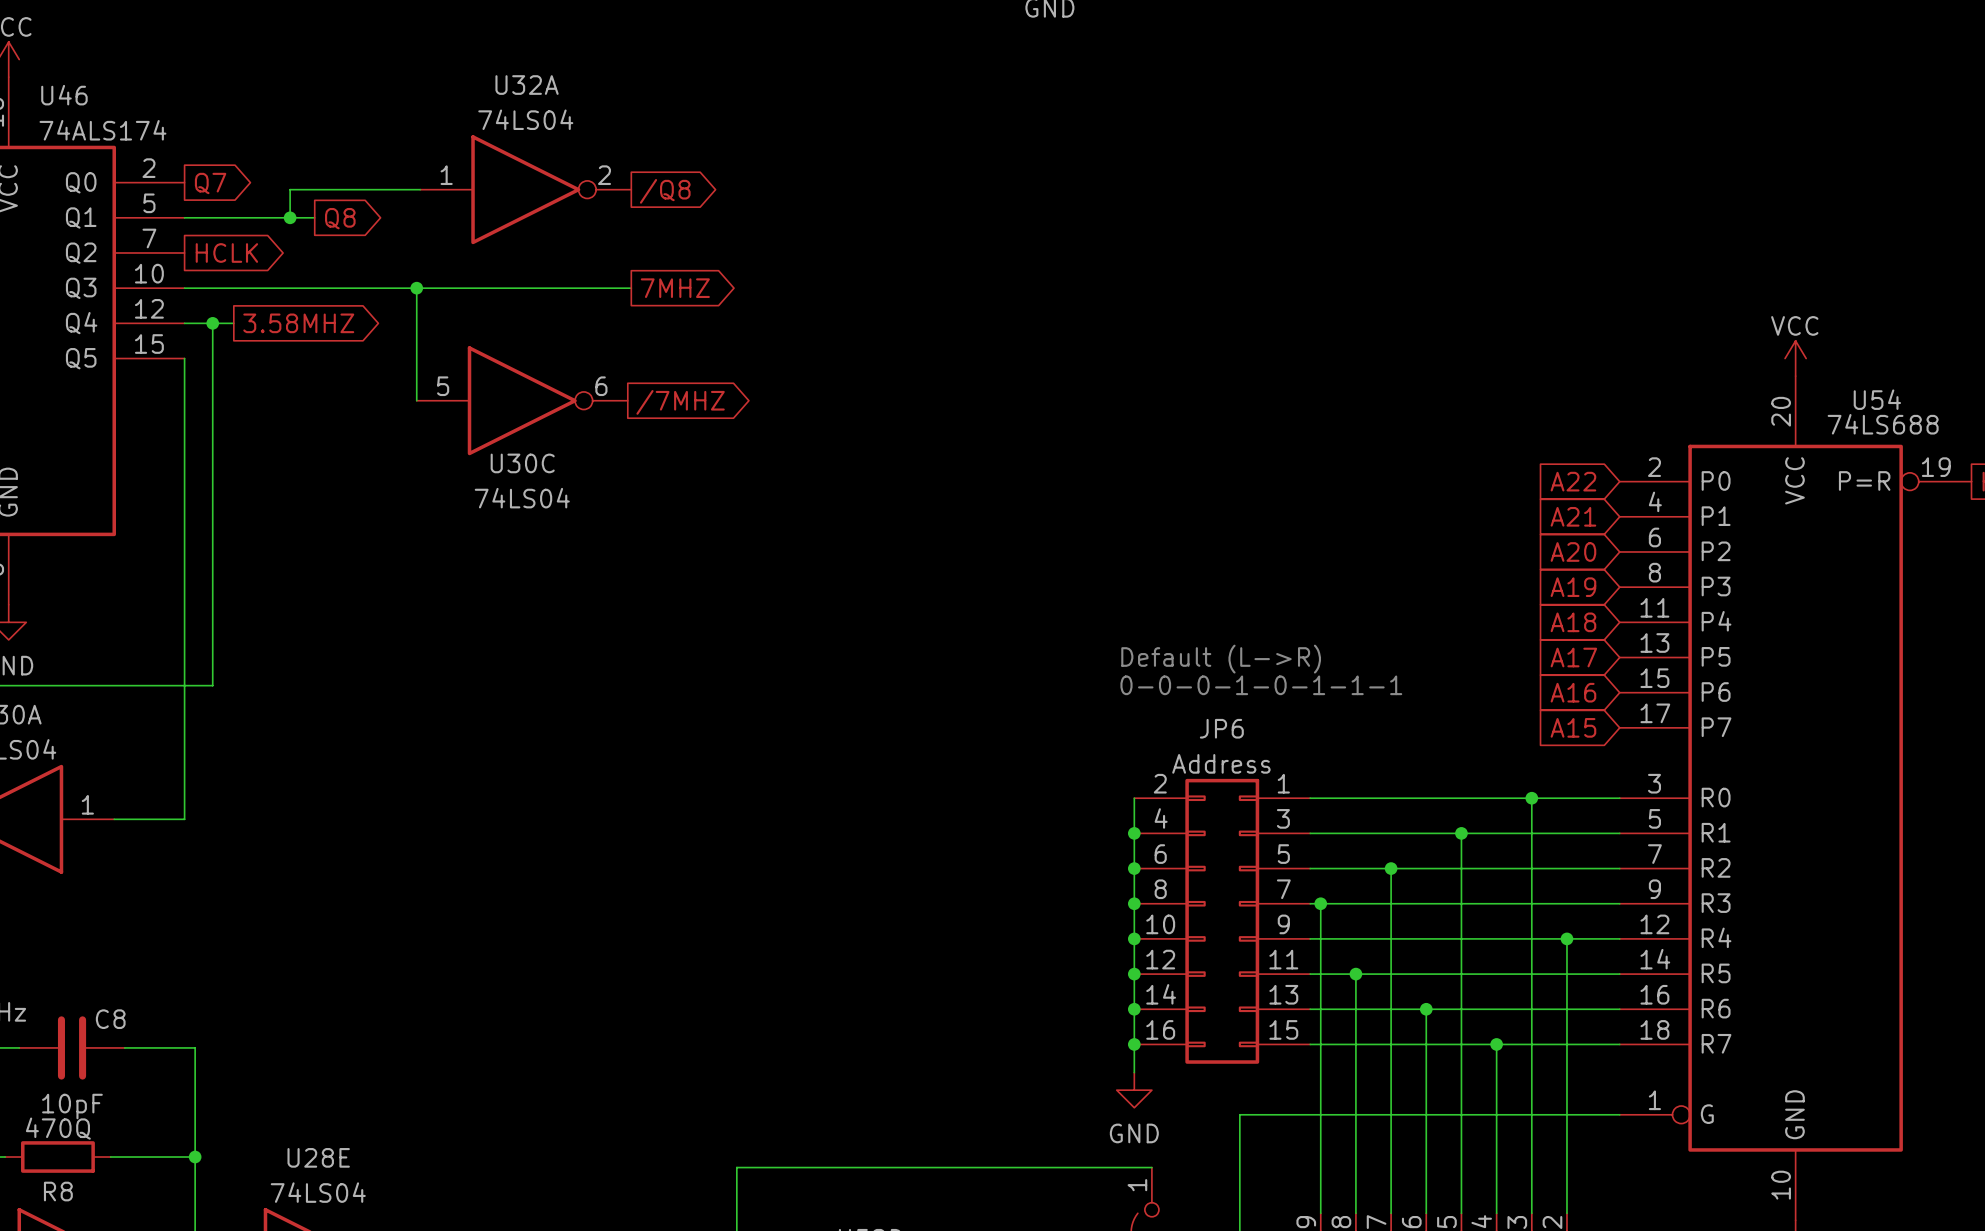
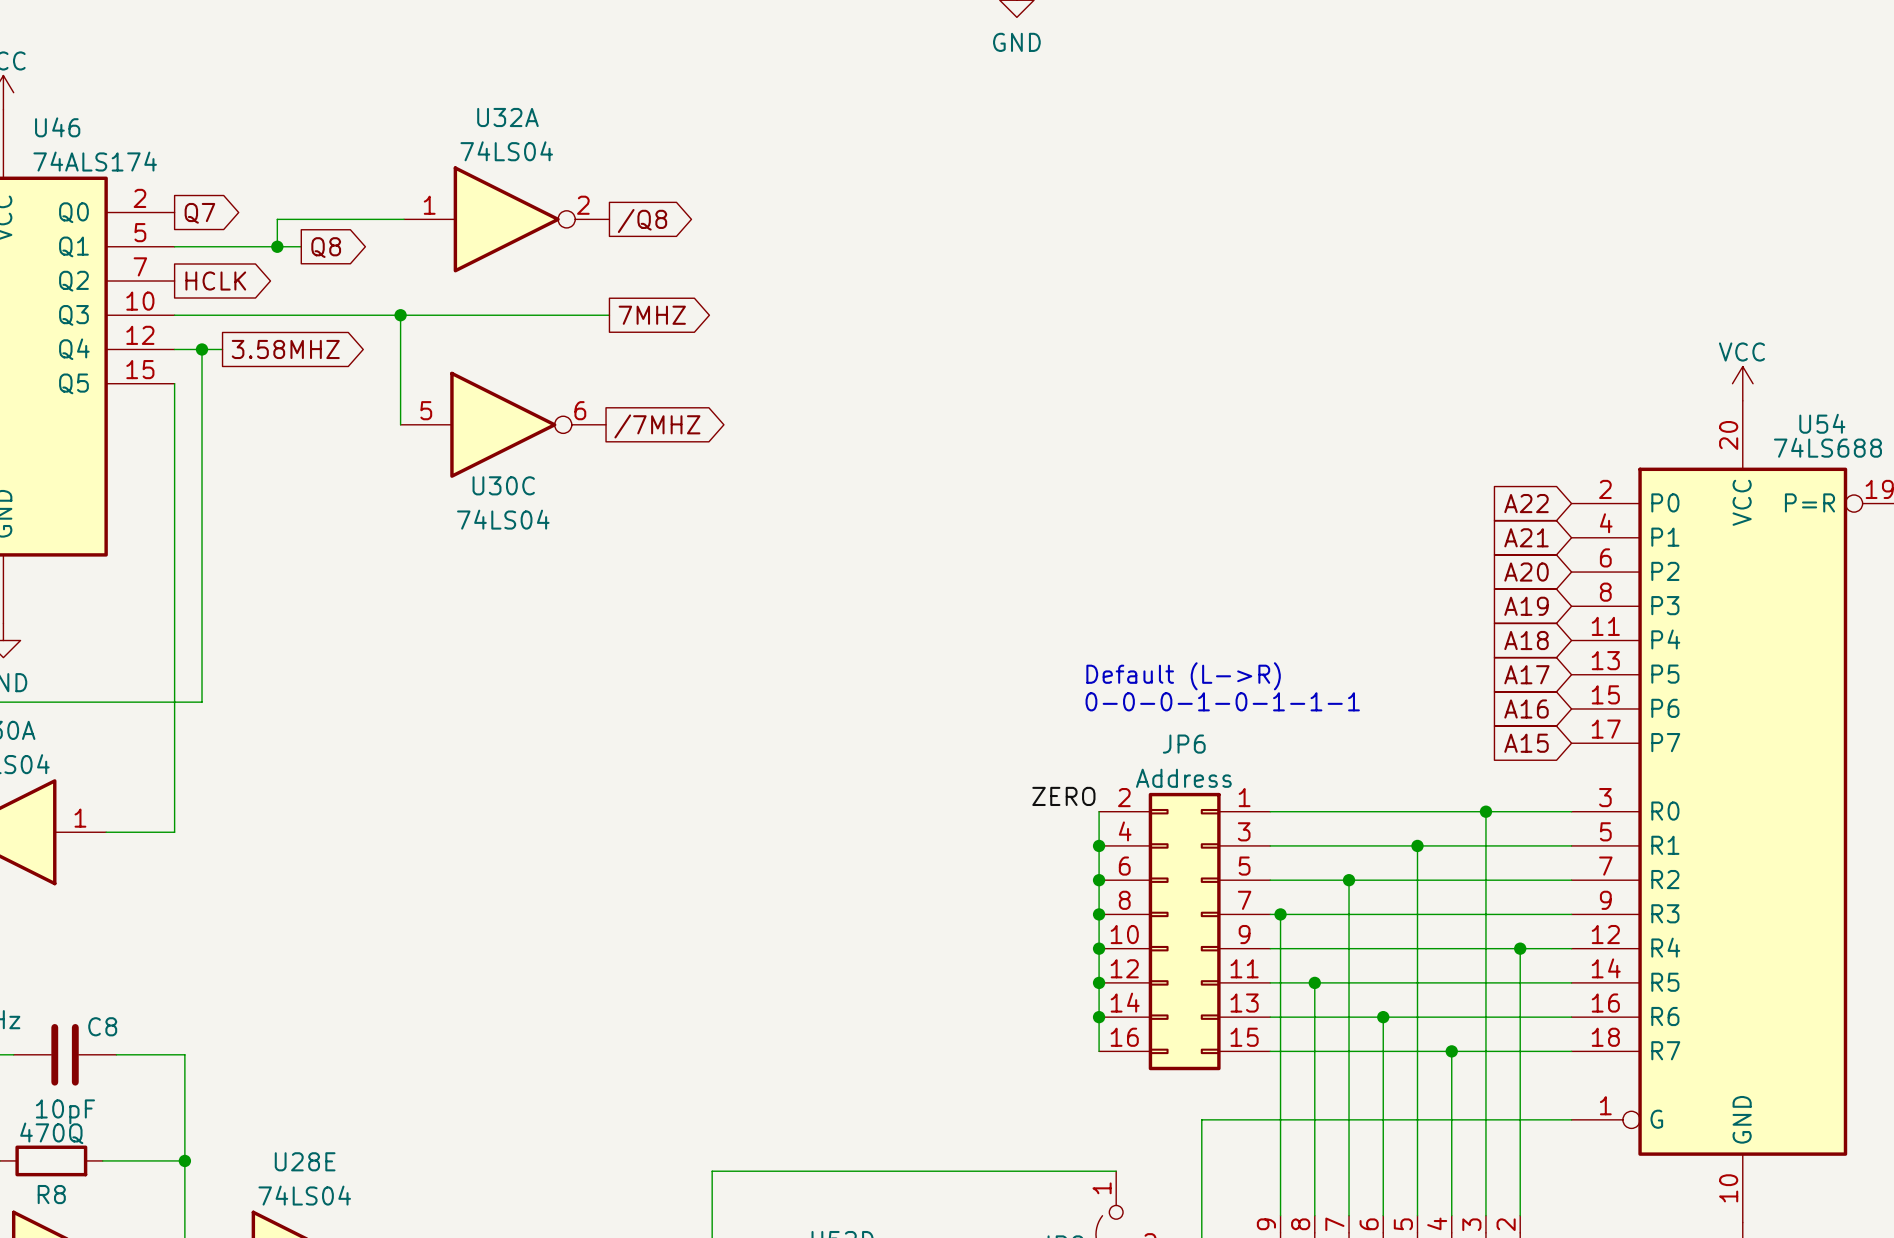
label: none -> ZERO (1063, 796)
wire: (1134, 1044) (1134, 1072) -> none
junction: (1134, 1044) -> none
power symbol: GND (1134, 1090) -> none

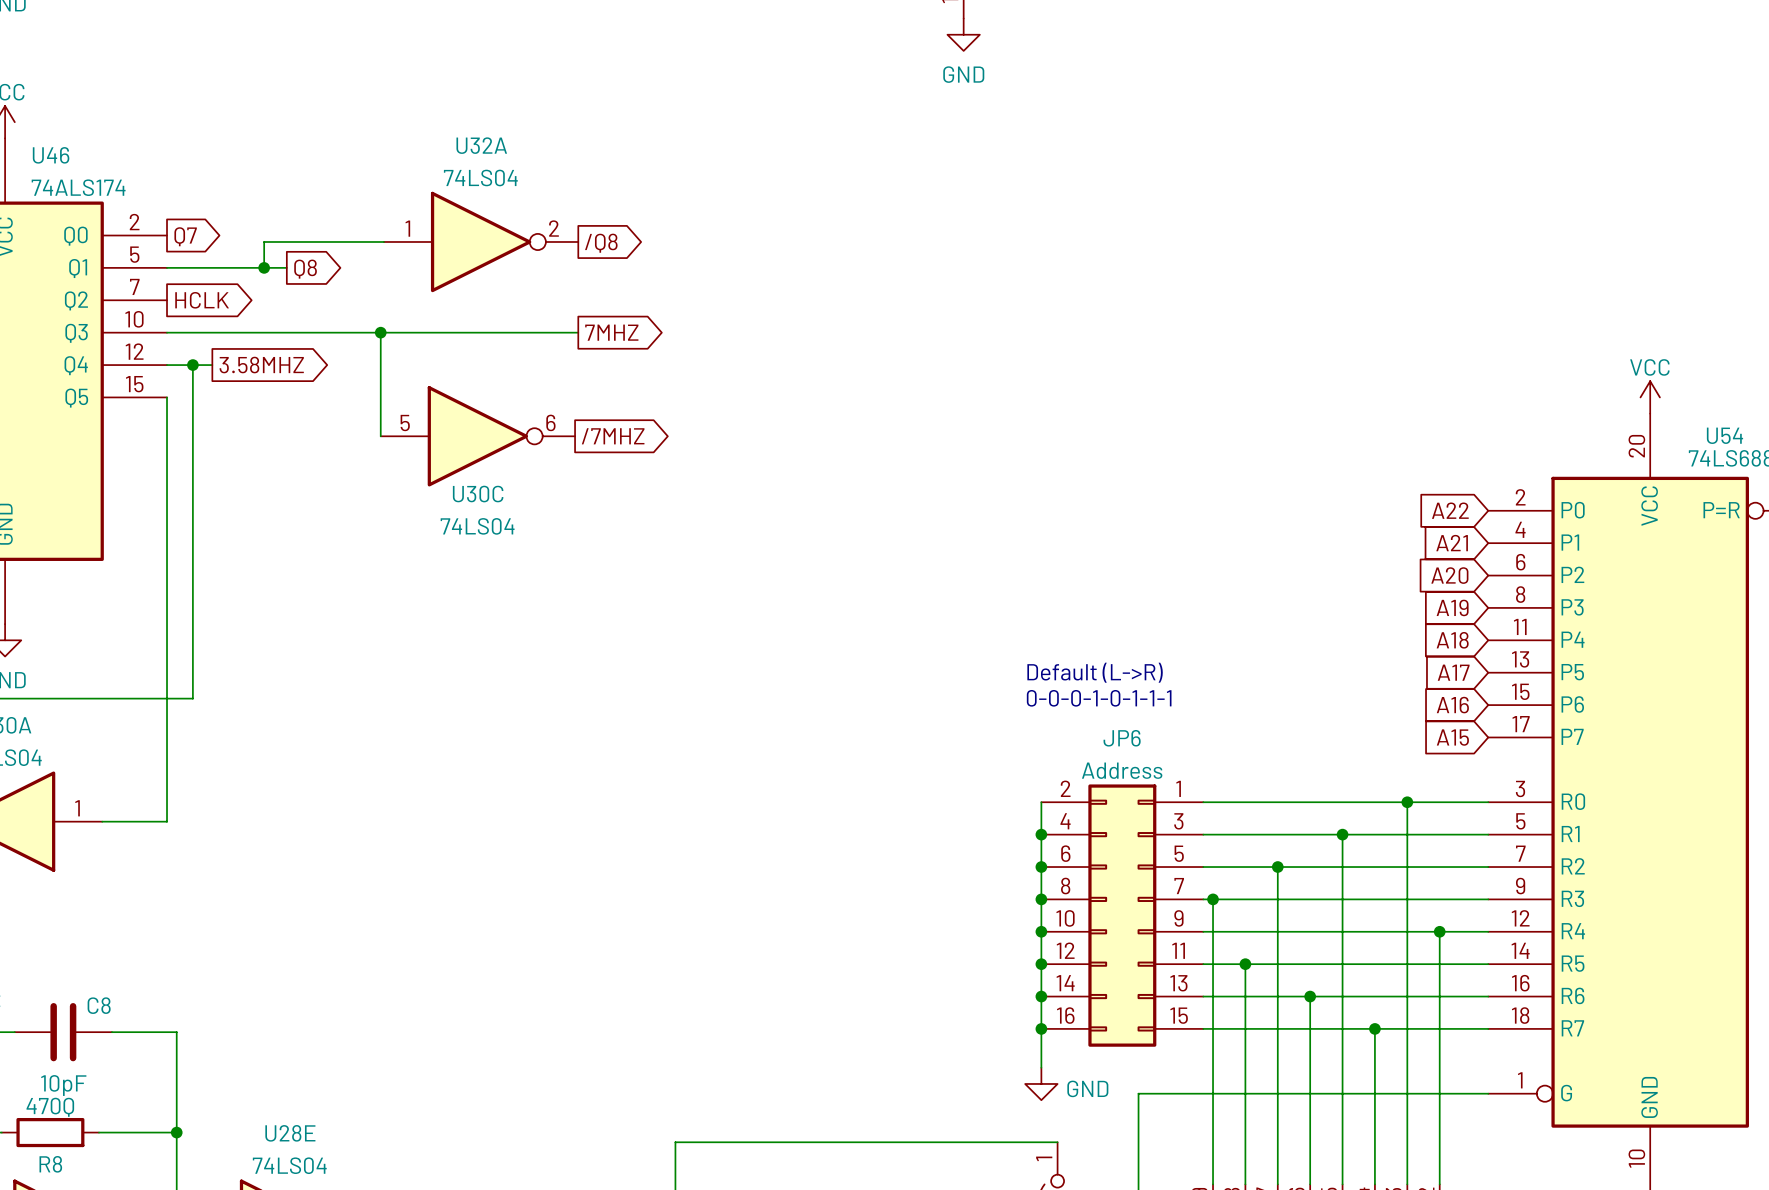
label: ZERO (1063, 796) -> none
wire: none -> (1041, 1028) (1041, 1067)
junction: none -> (1041, 1028)
power symbol: none -> GND (1041, 1083)

